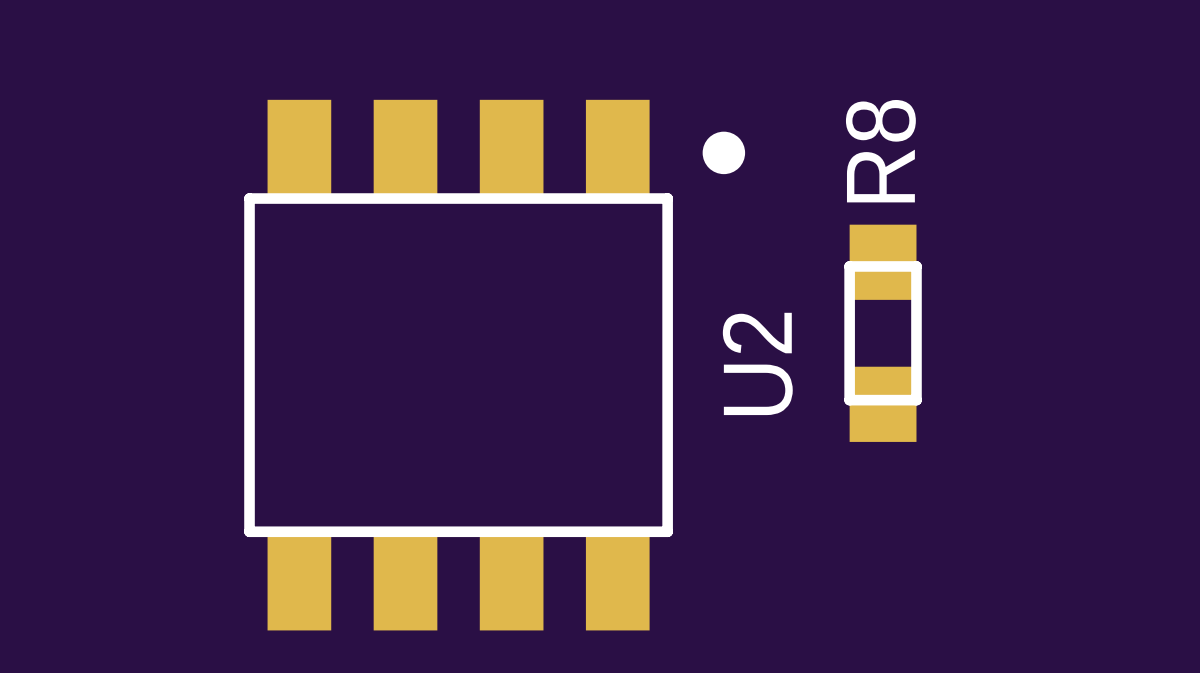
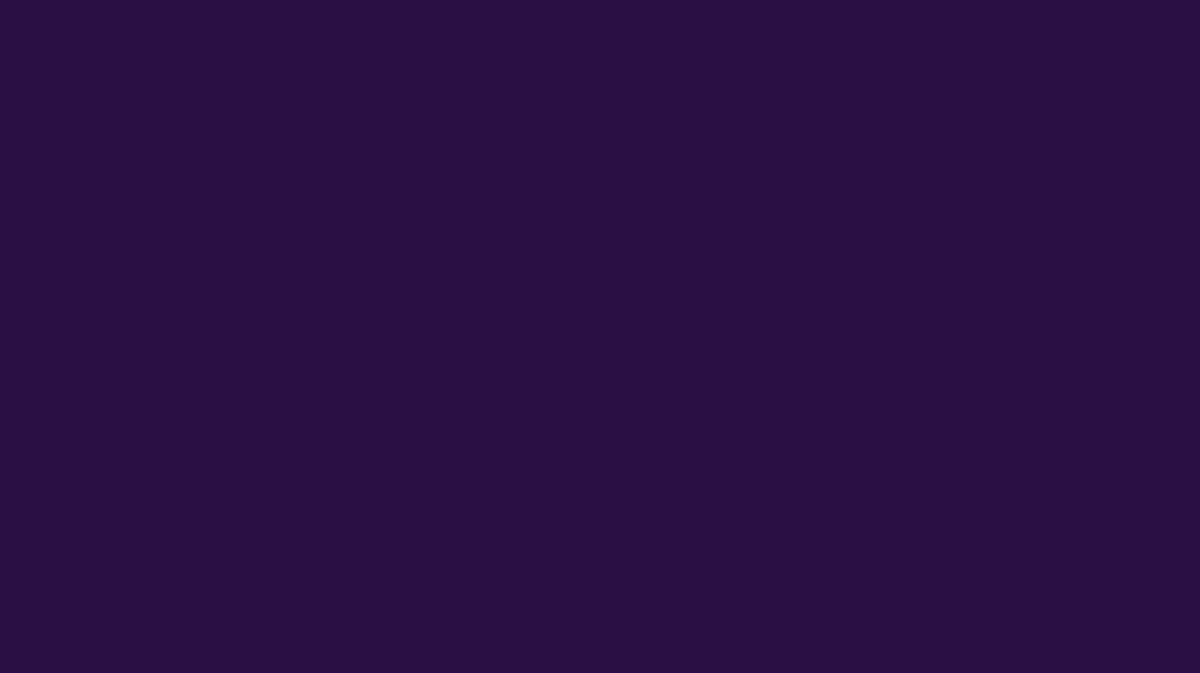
R8: (883, 333) -> none
U2: (494, 365) -> none

